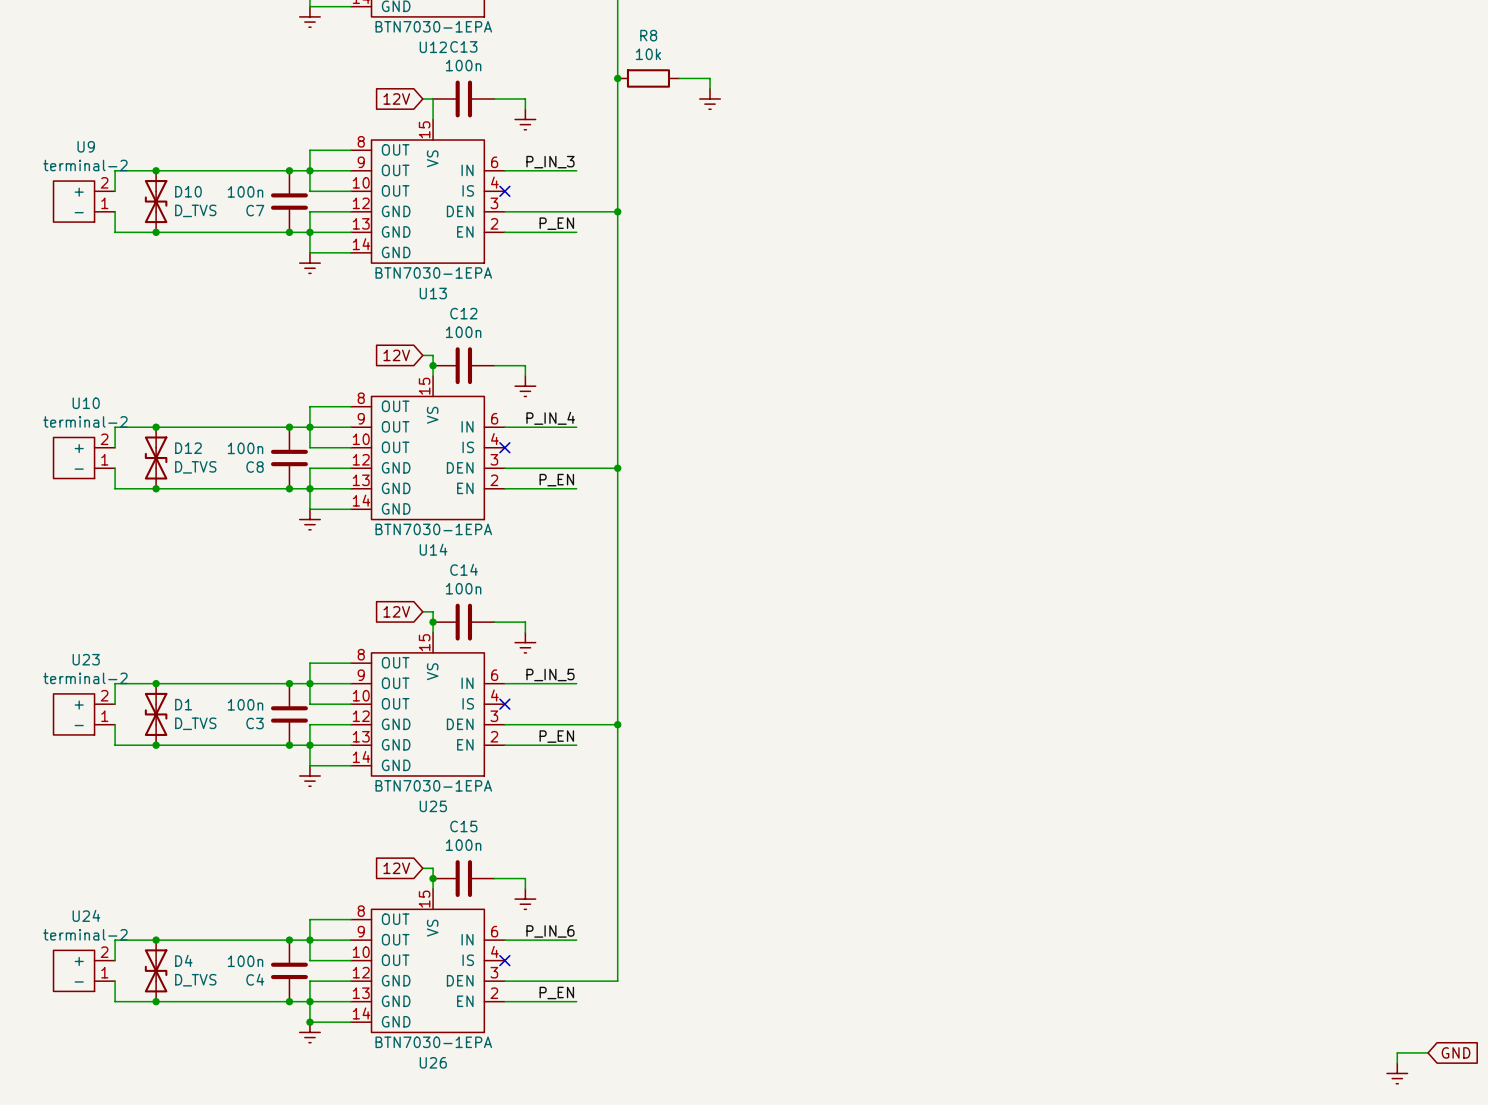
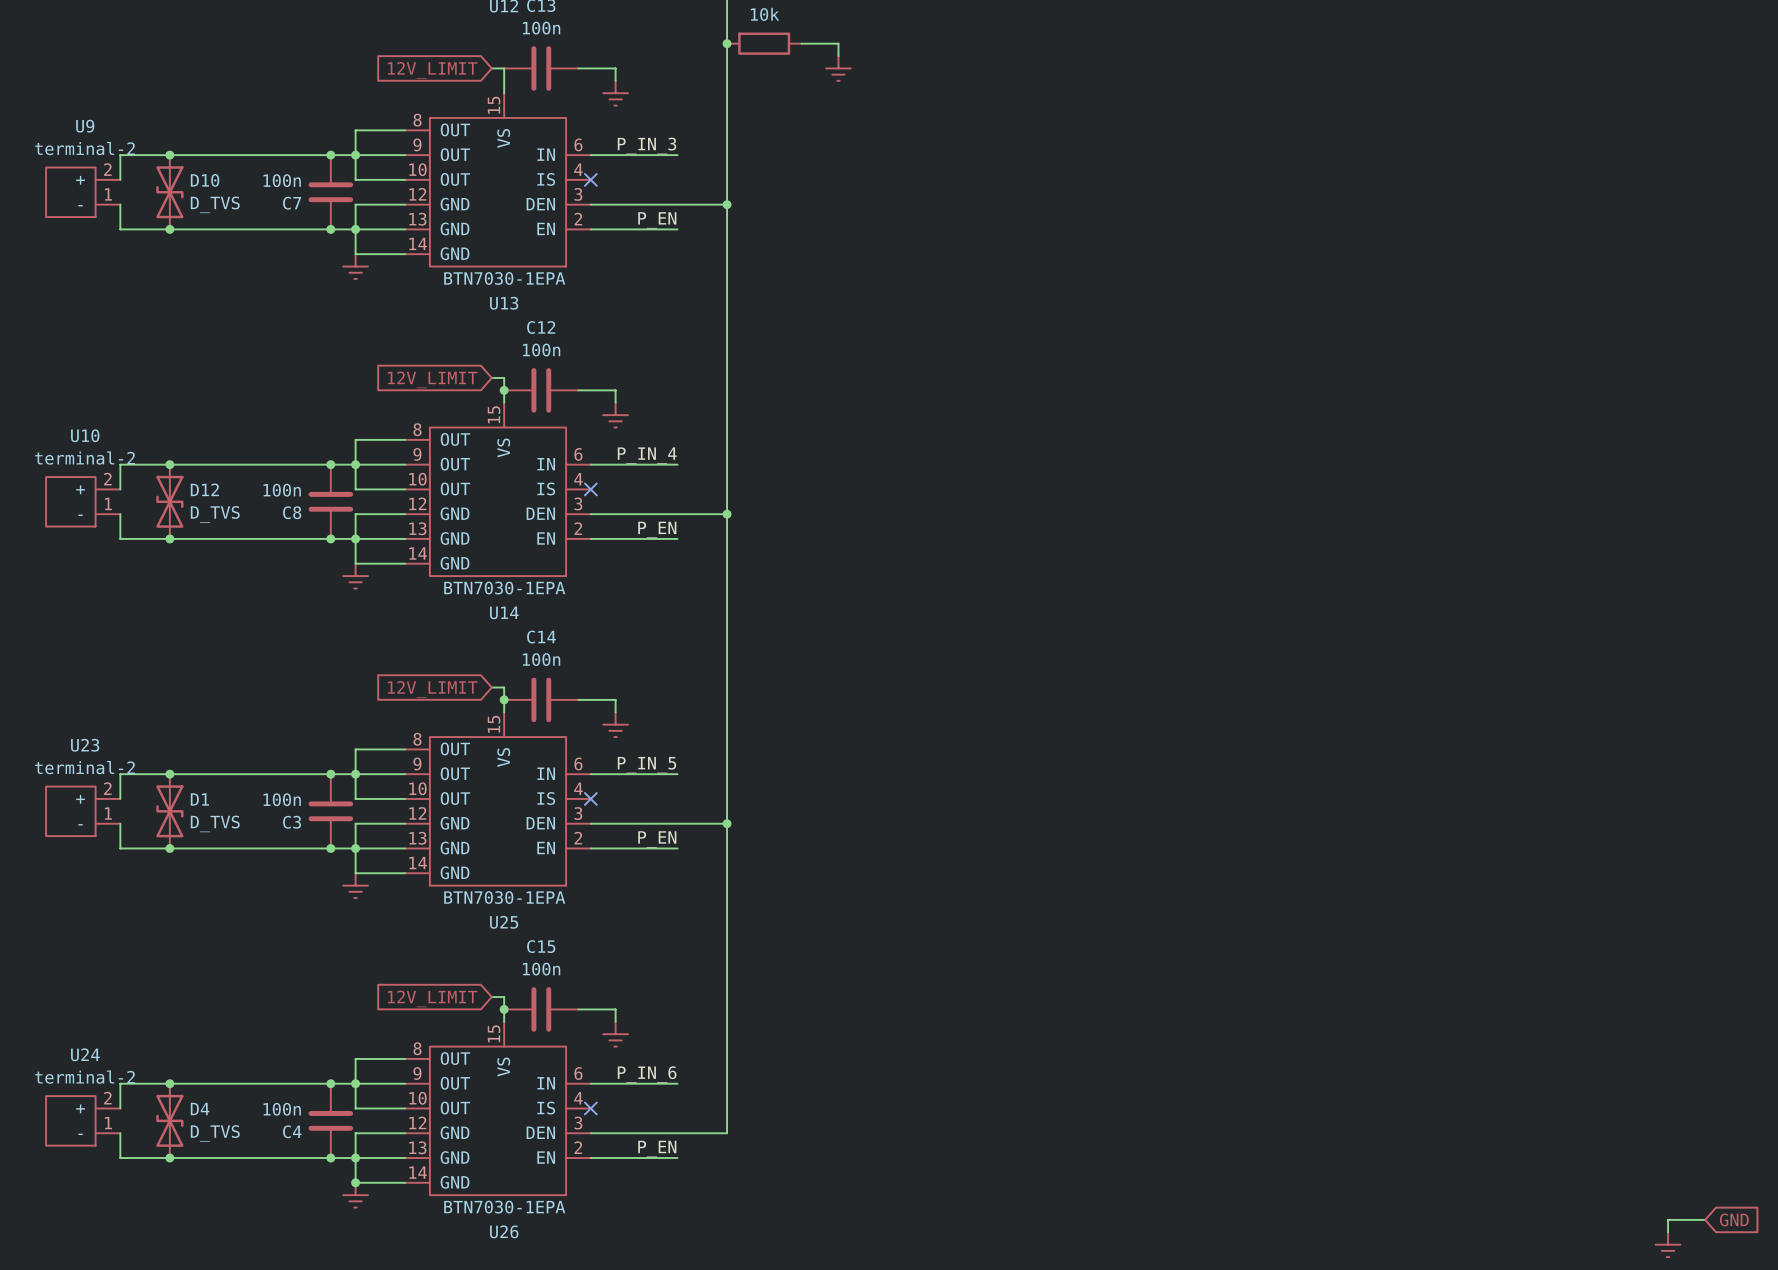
global label: 12V (396, 98) -> 12V_LIMIT (432, 70)
global label: 12V (396, 355) -> 12V_LIMIT (432, 379)
global label: 12V (396, 611) -> 12V_LIMIT (432, 689)
global label: 12V (396, 868) -> 12V_LIMIT (432, 998)

